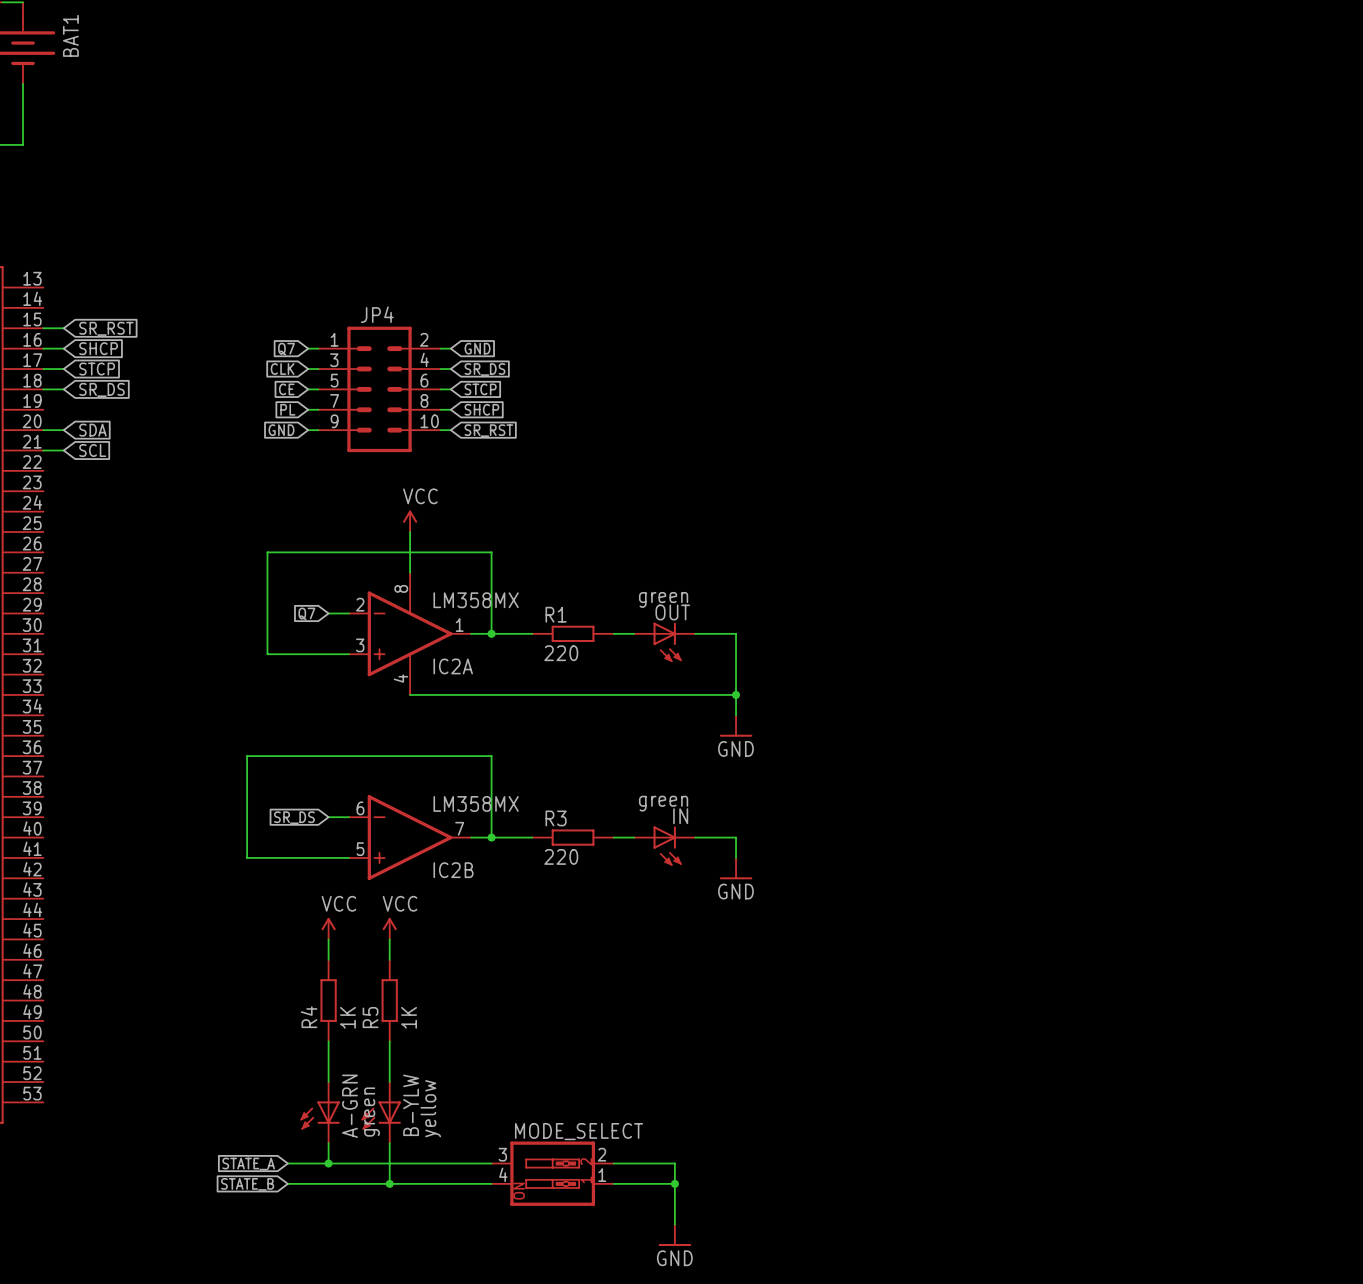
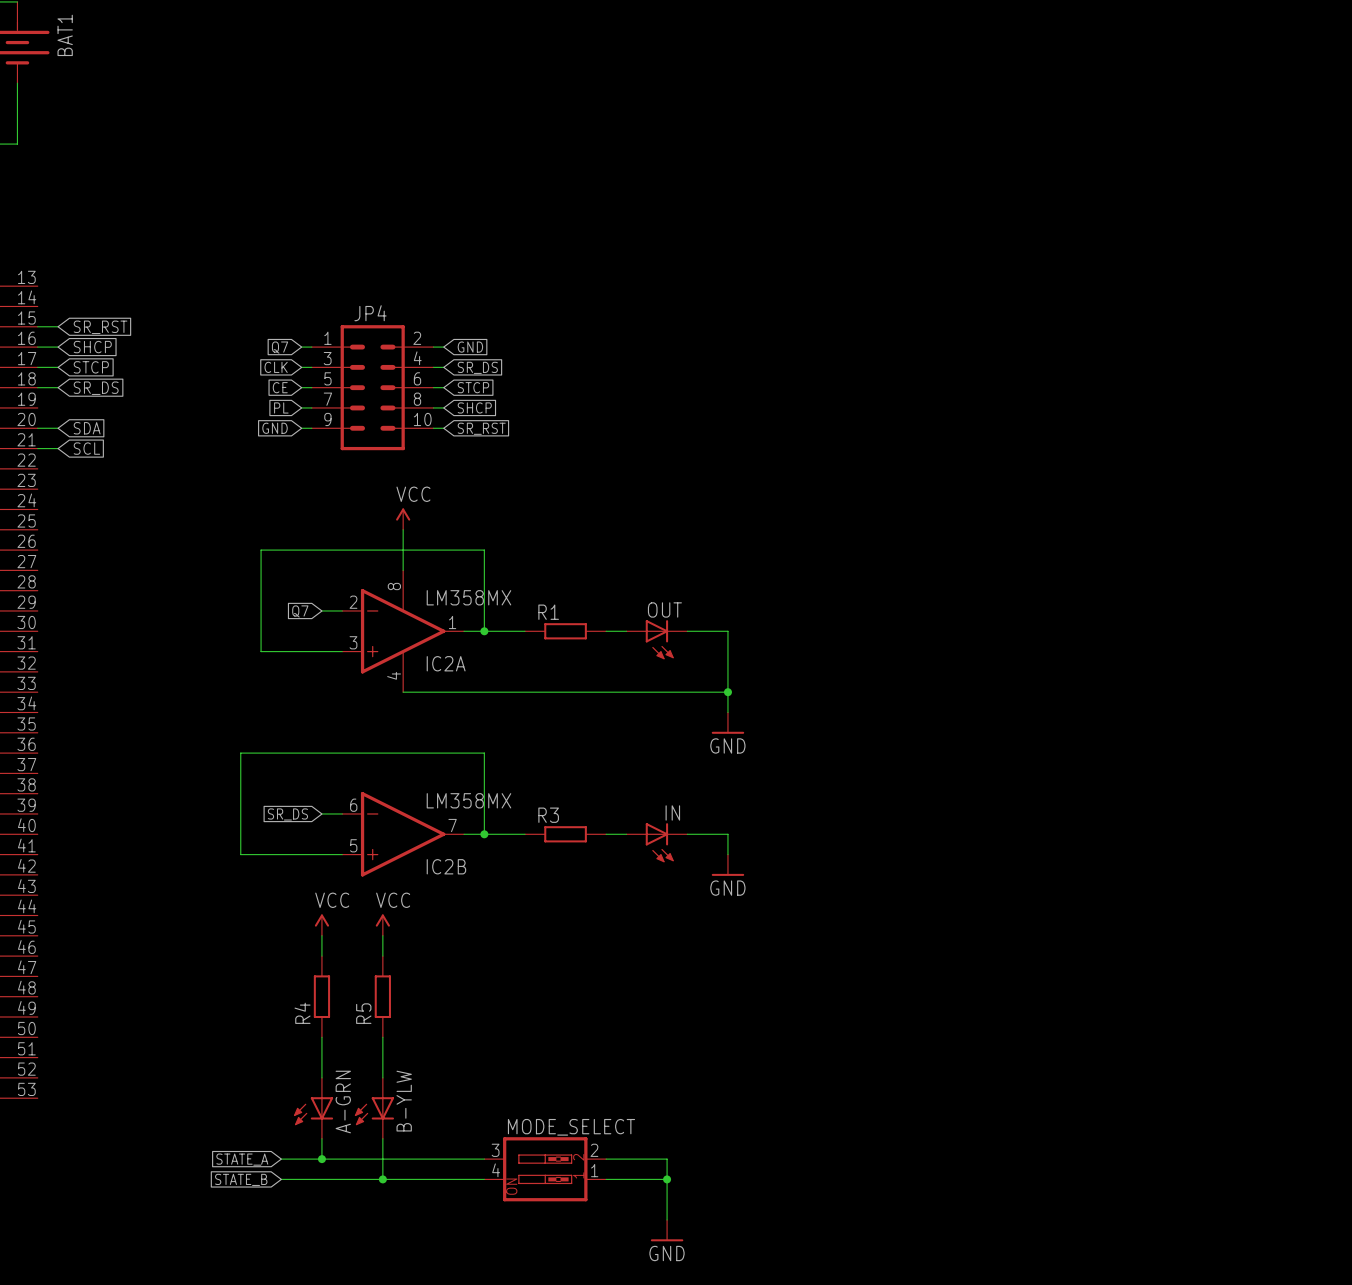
OUT value: green (663, 599) -> none
R1 value: 220 (561, 653) -> none
IN value: green (663, 803) -> none
R3 value: 220 (561, 856) -> none
R4 value: 1K (347, 1017) -> none
R5 value: 1K (409, 1017) -> none
B-YLW value: yellow (430, 1108) -> none
A-GRN value: green (372, 1112) -> none

